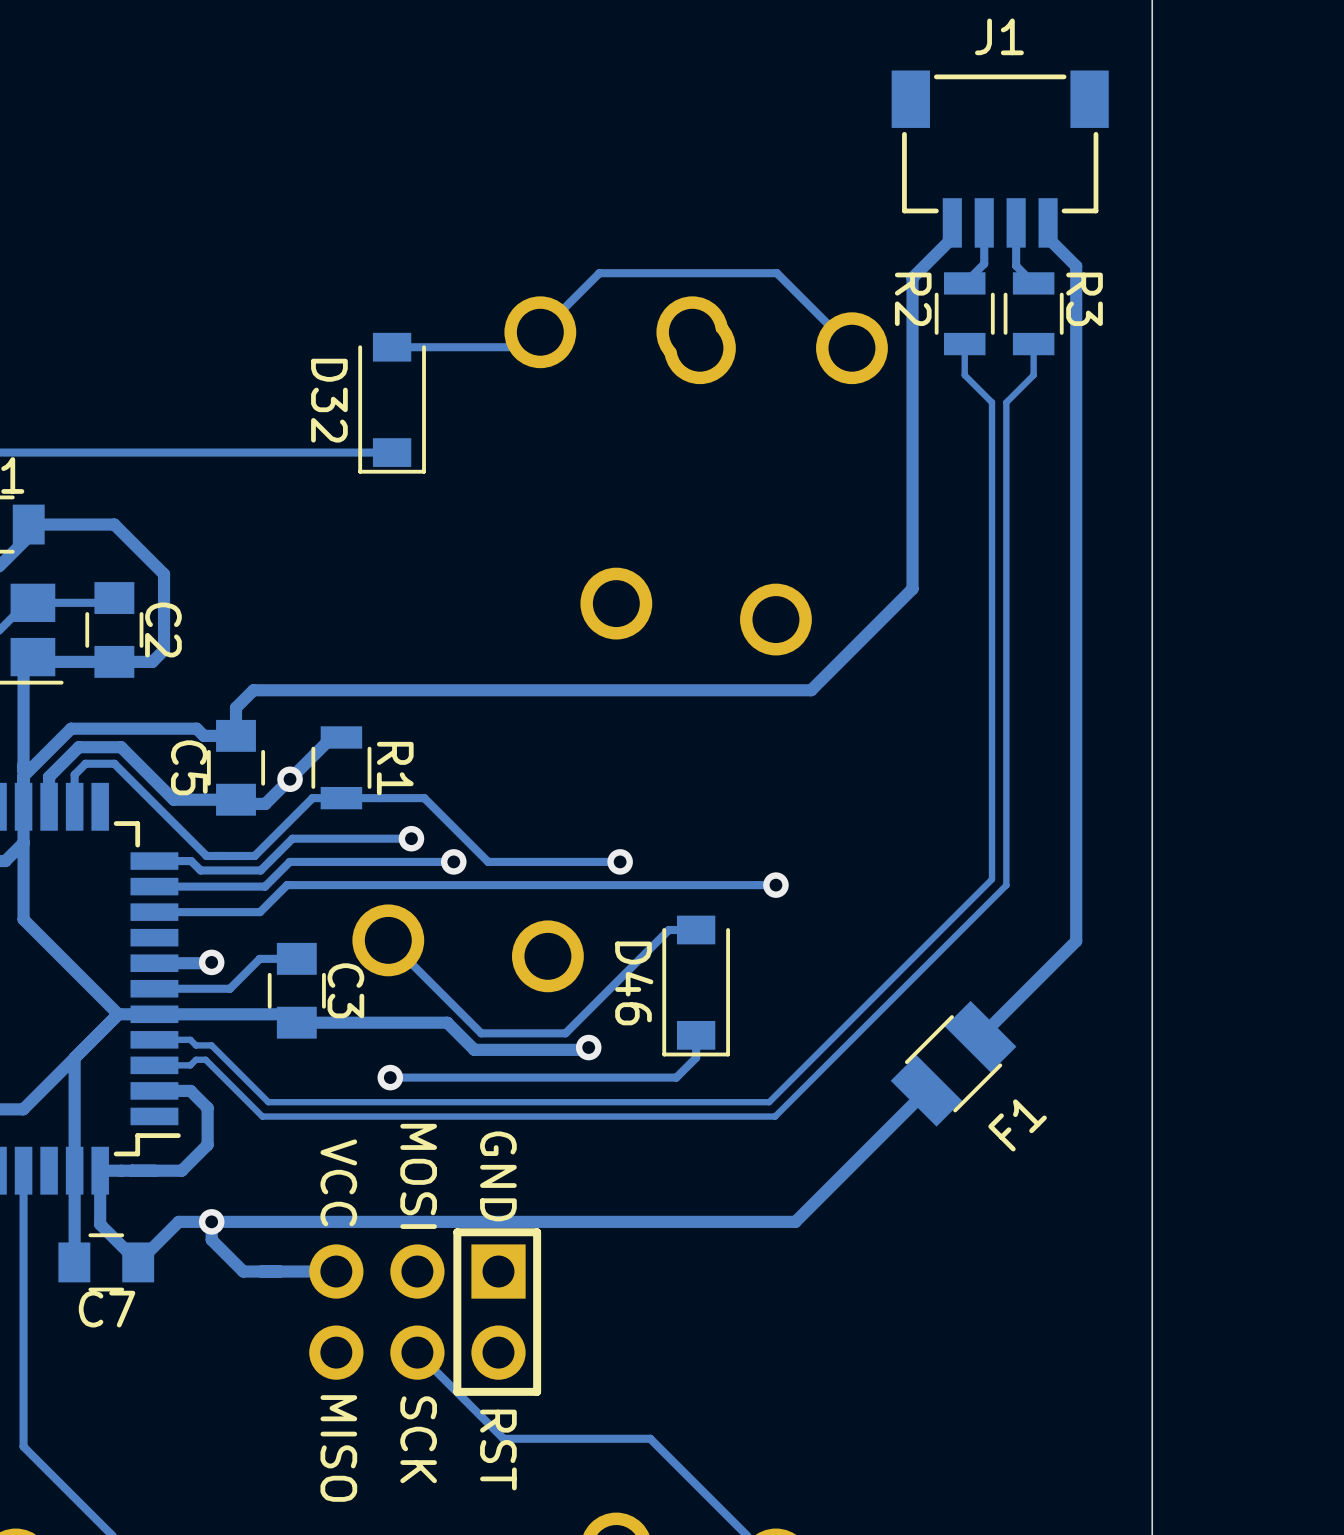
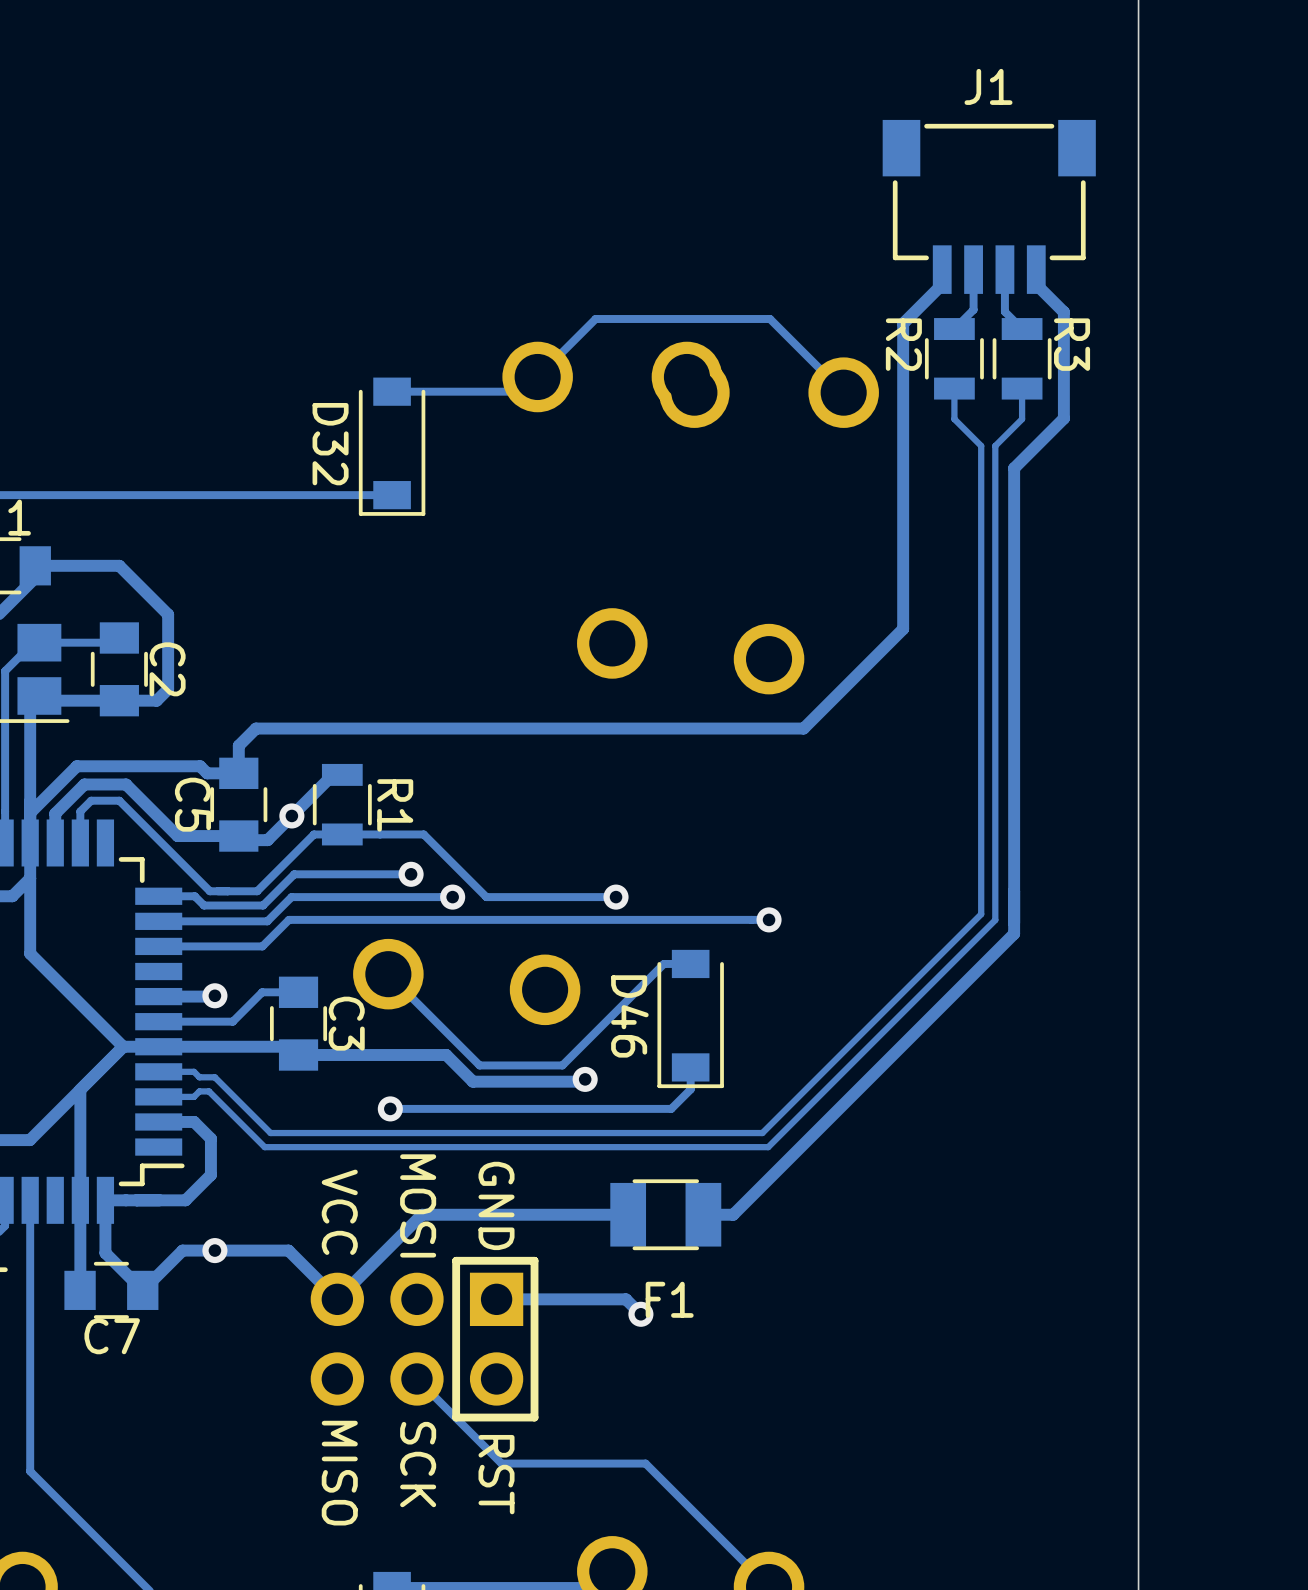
track: (1076, 374) (1076, 941) (980, 1036) -> (1063, 418) (1014, 468) (1014, 933) (733, 1214) (703, 1214)
F1 rotation: 0° (953, 1063) -> 45° clockwise (665, 1214)
F1 position: (953, 1063) -> (665, 1214)
track: (926, 1090) (795, 1221) (286, 1221) -> (628, 1214) (421, 1214) (337, 1299) (288, 1250)
track: (211, 1221) (211, 1239) (243, 1271) (336, 1271) -> none
track: none -> (496, 1299) (625, 1299) (640, 1314)
via: none -> (640, 1314)

